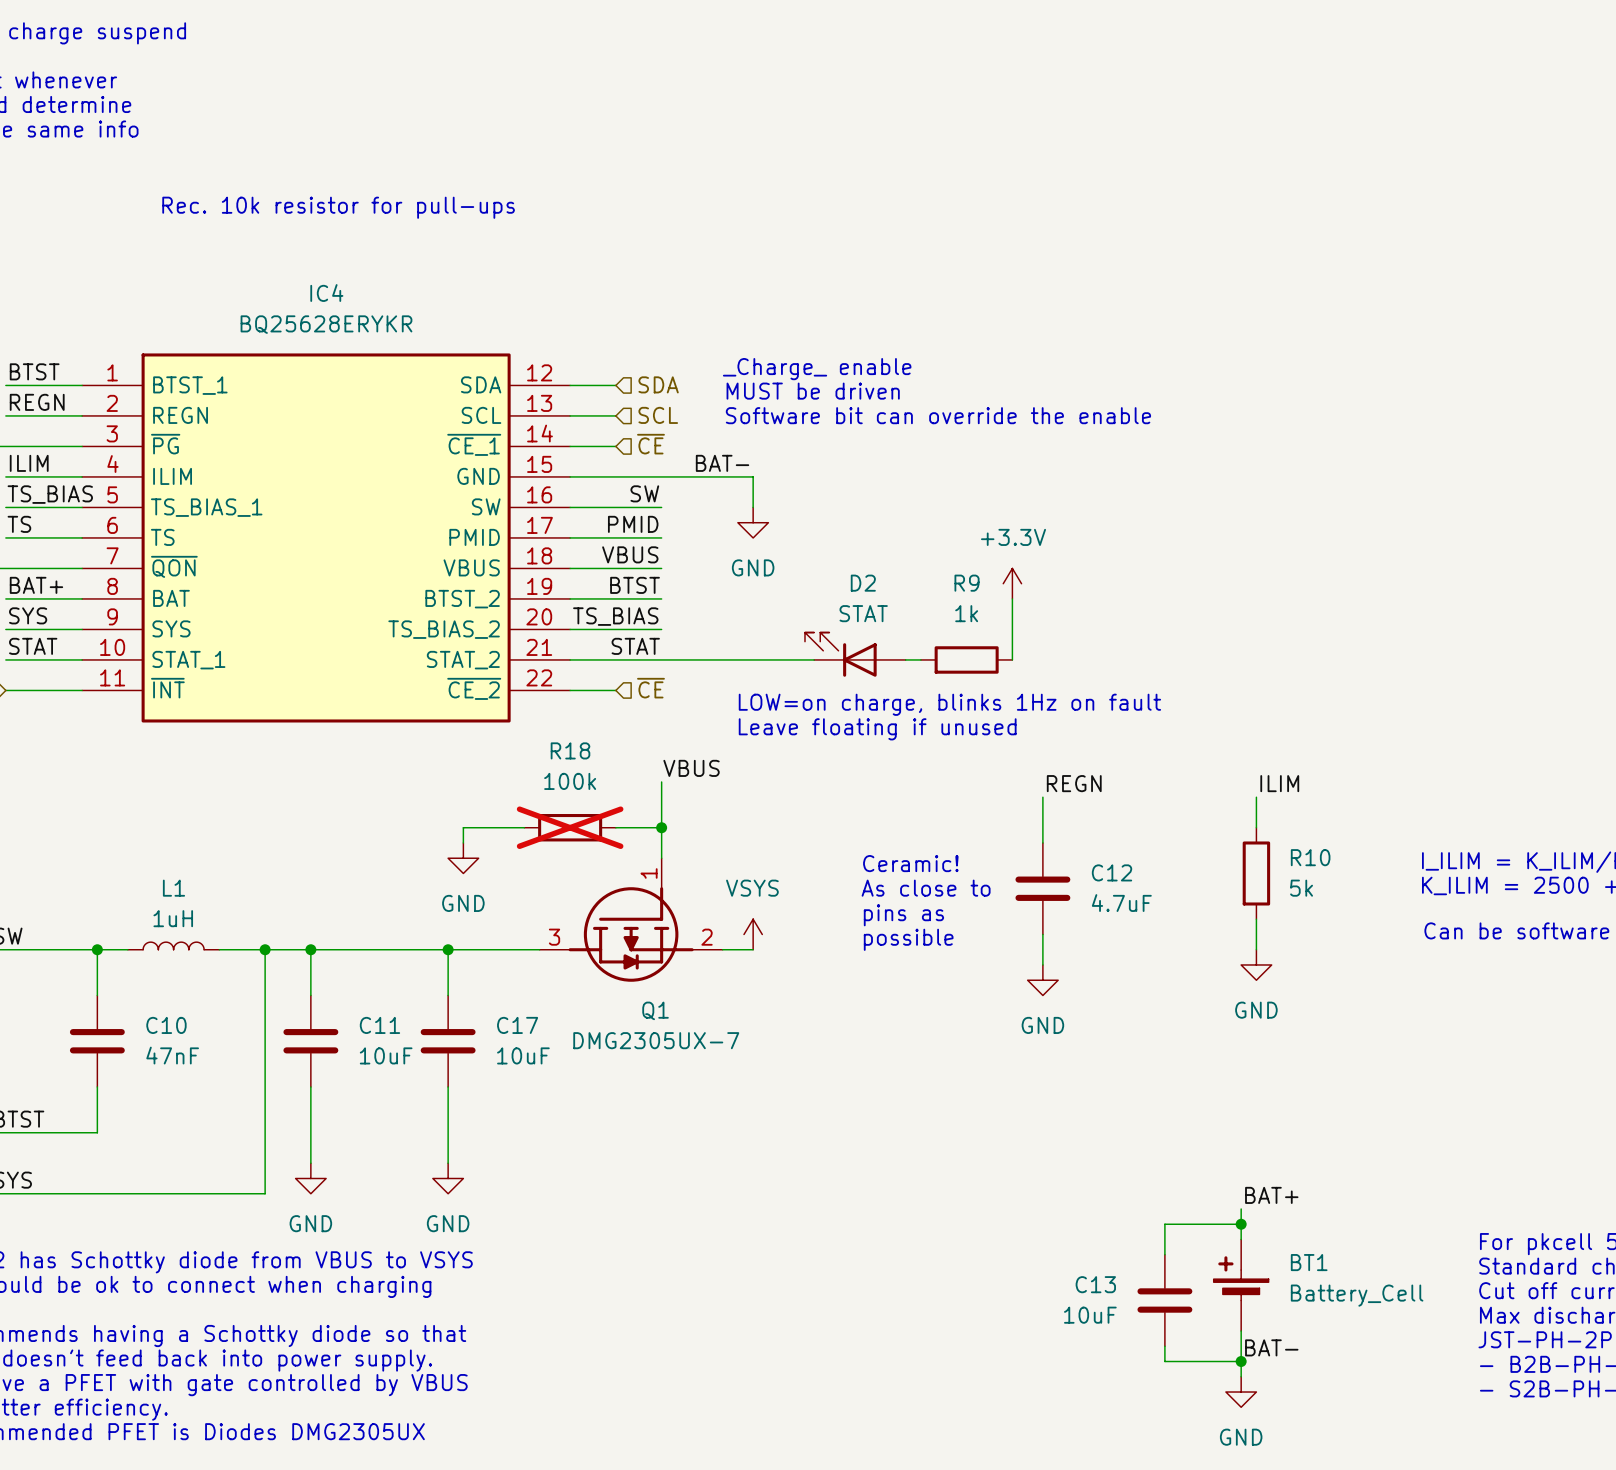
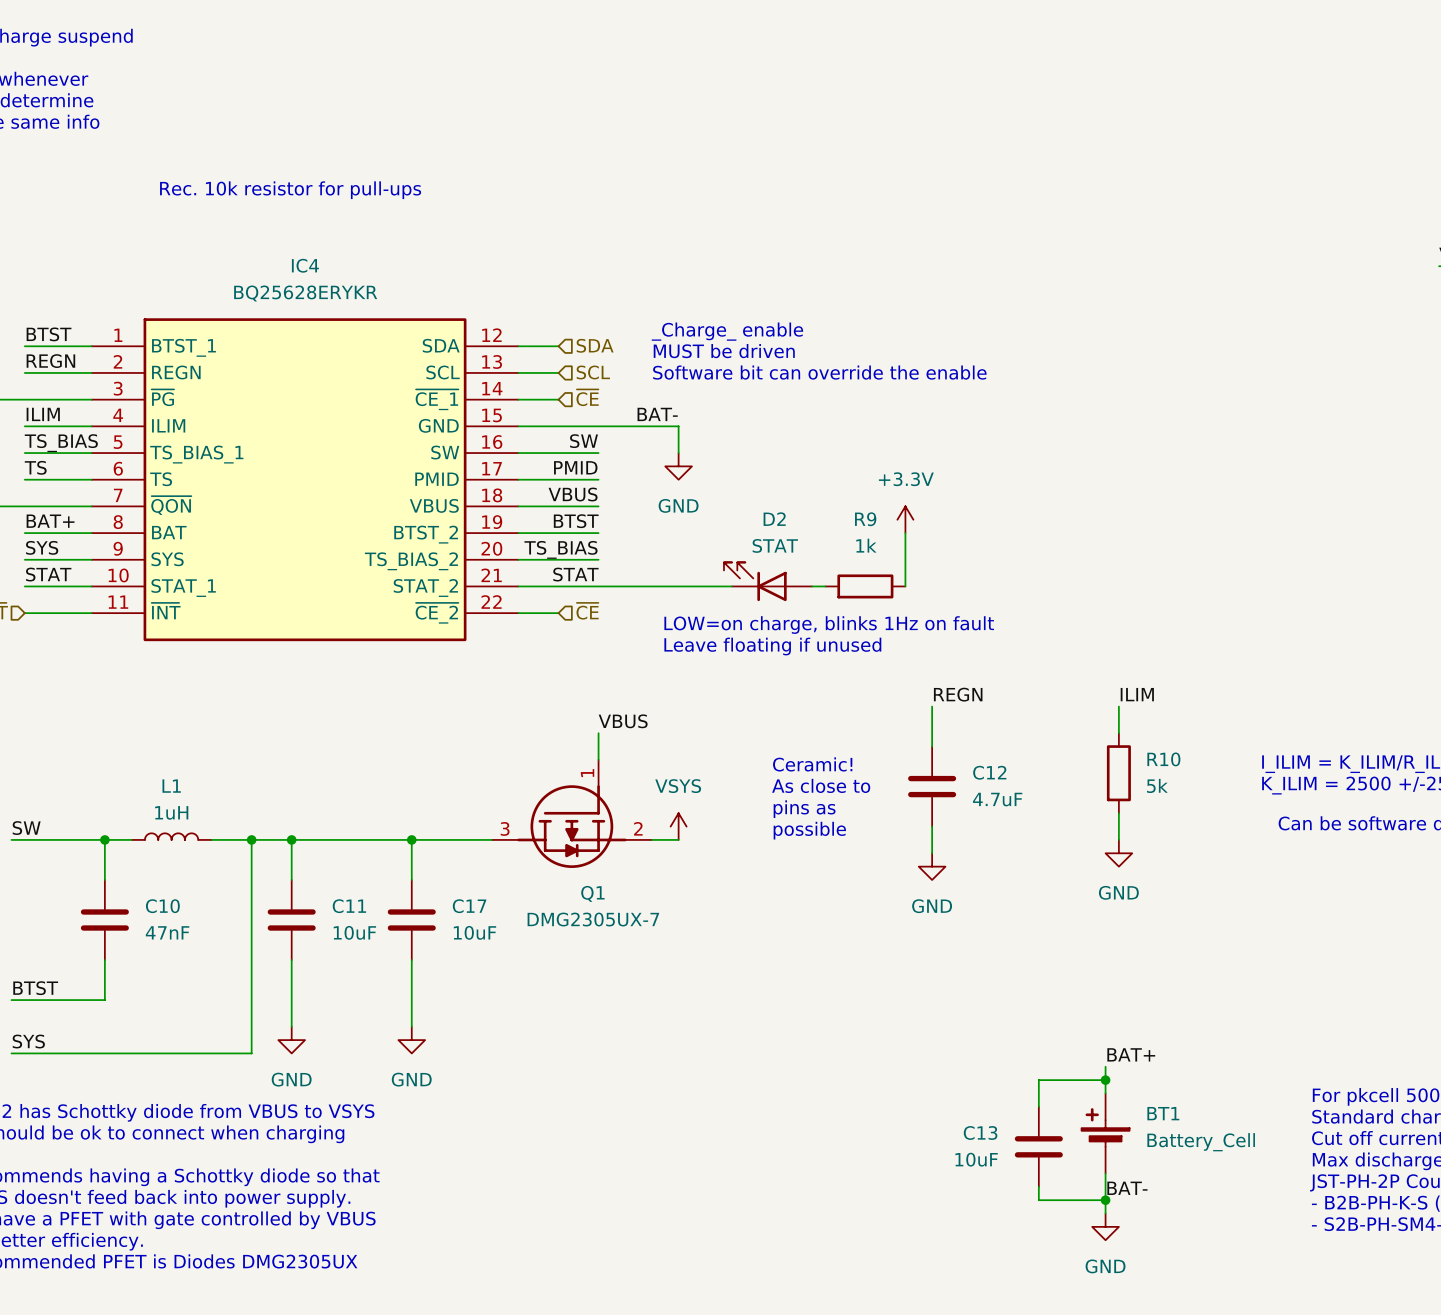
label position: VBUS (691, 768) -> VBUS (623, 721)
wire: (661, 781) (661, 827) (615, 827) -> none
wire: (524, 827) (463, 827) (463, 842) -> none
R18: 100k (570, 827) -> none
junction: (661, 827) -> none
power symbol: GND (463, 858) -> none

